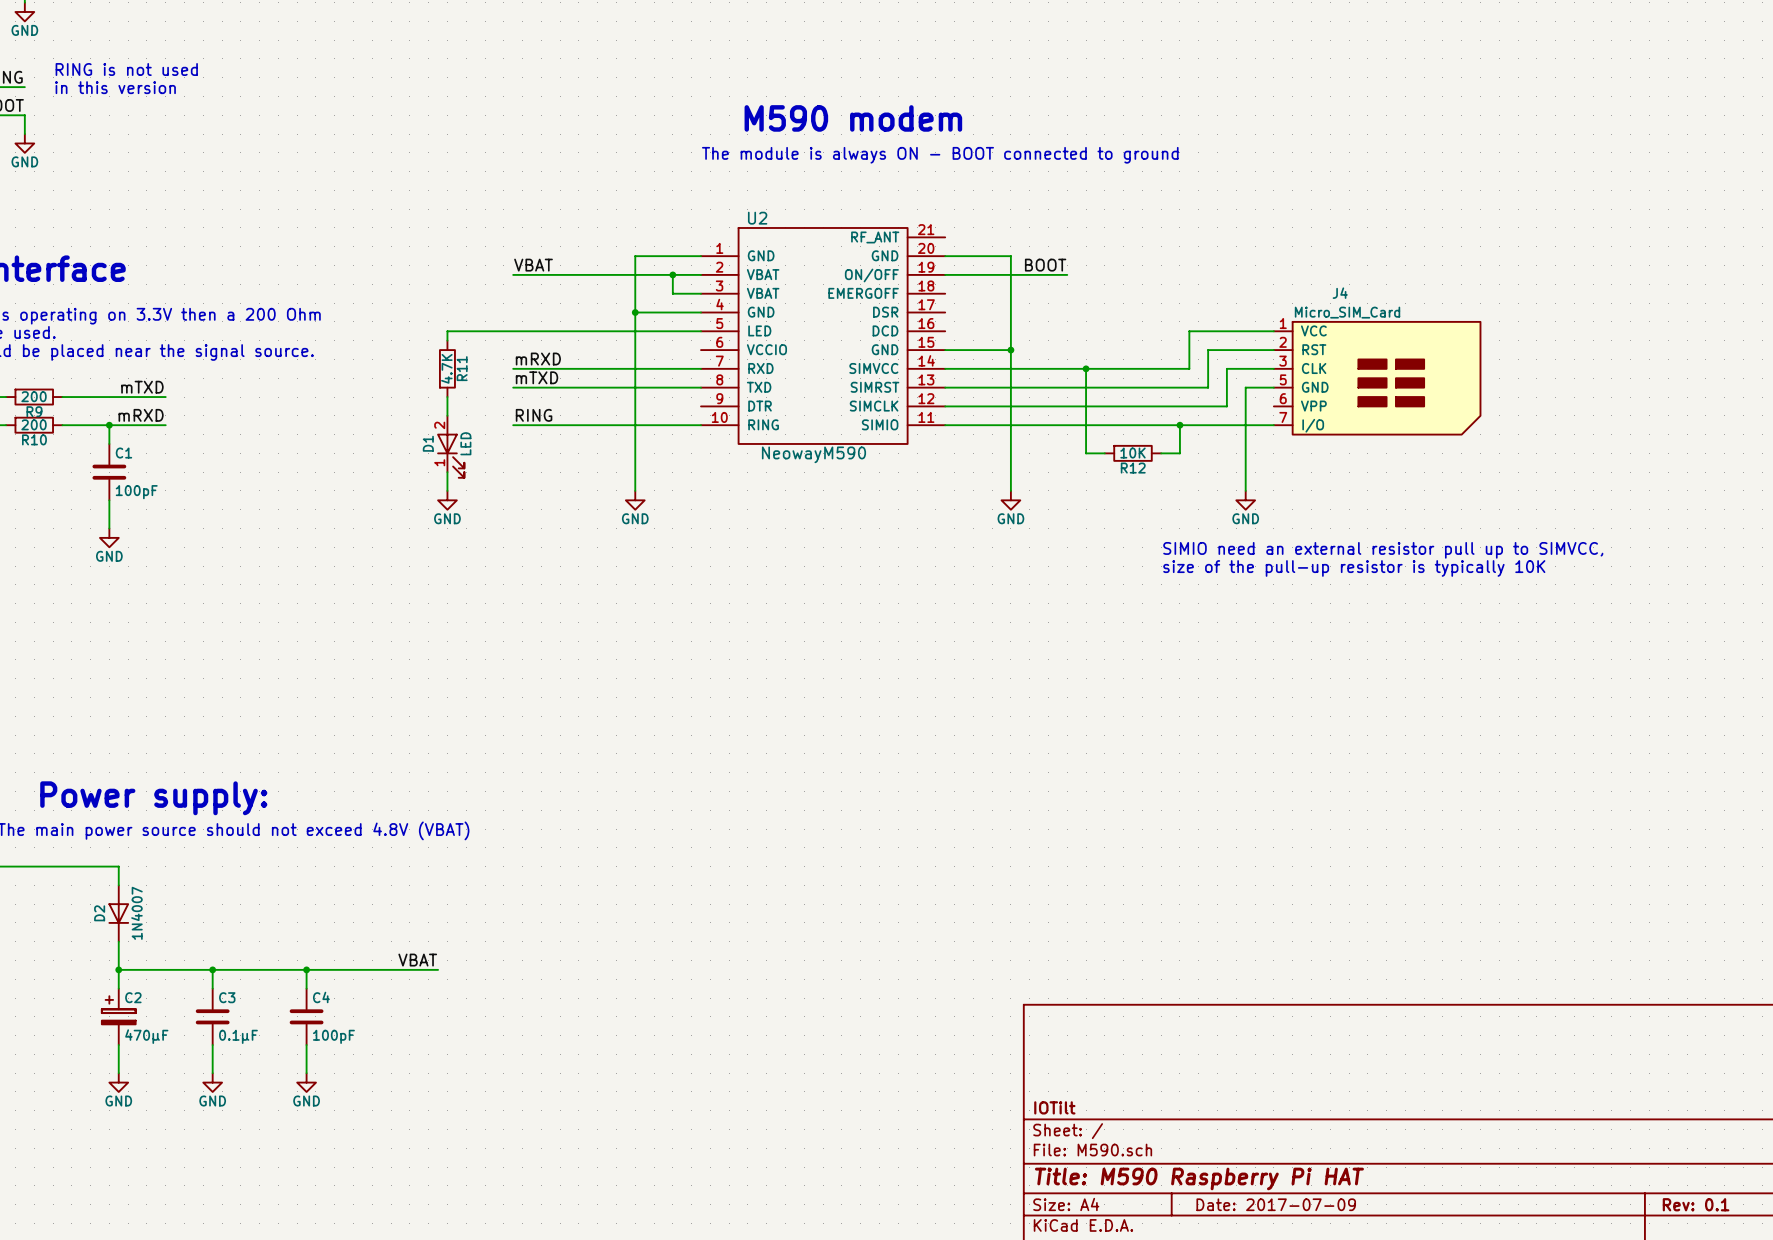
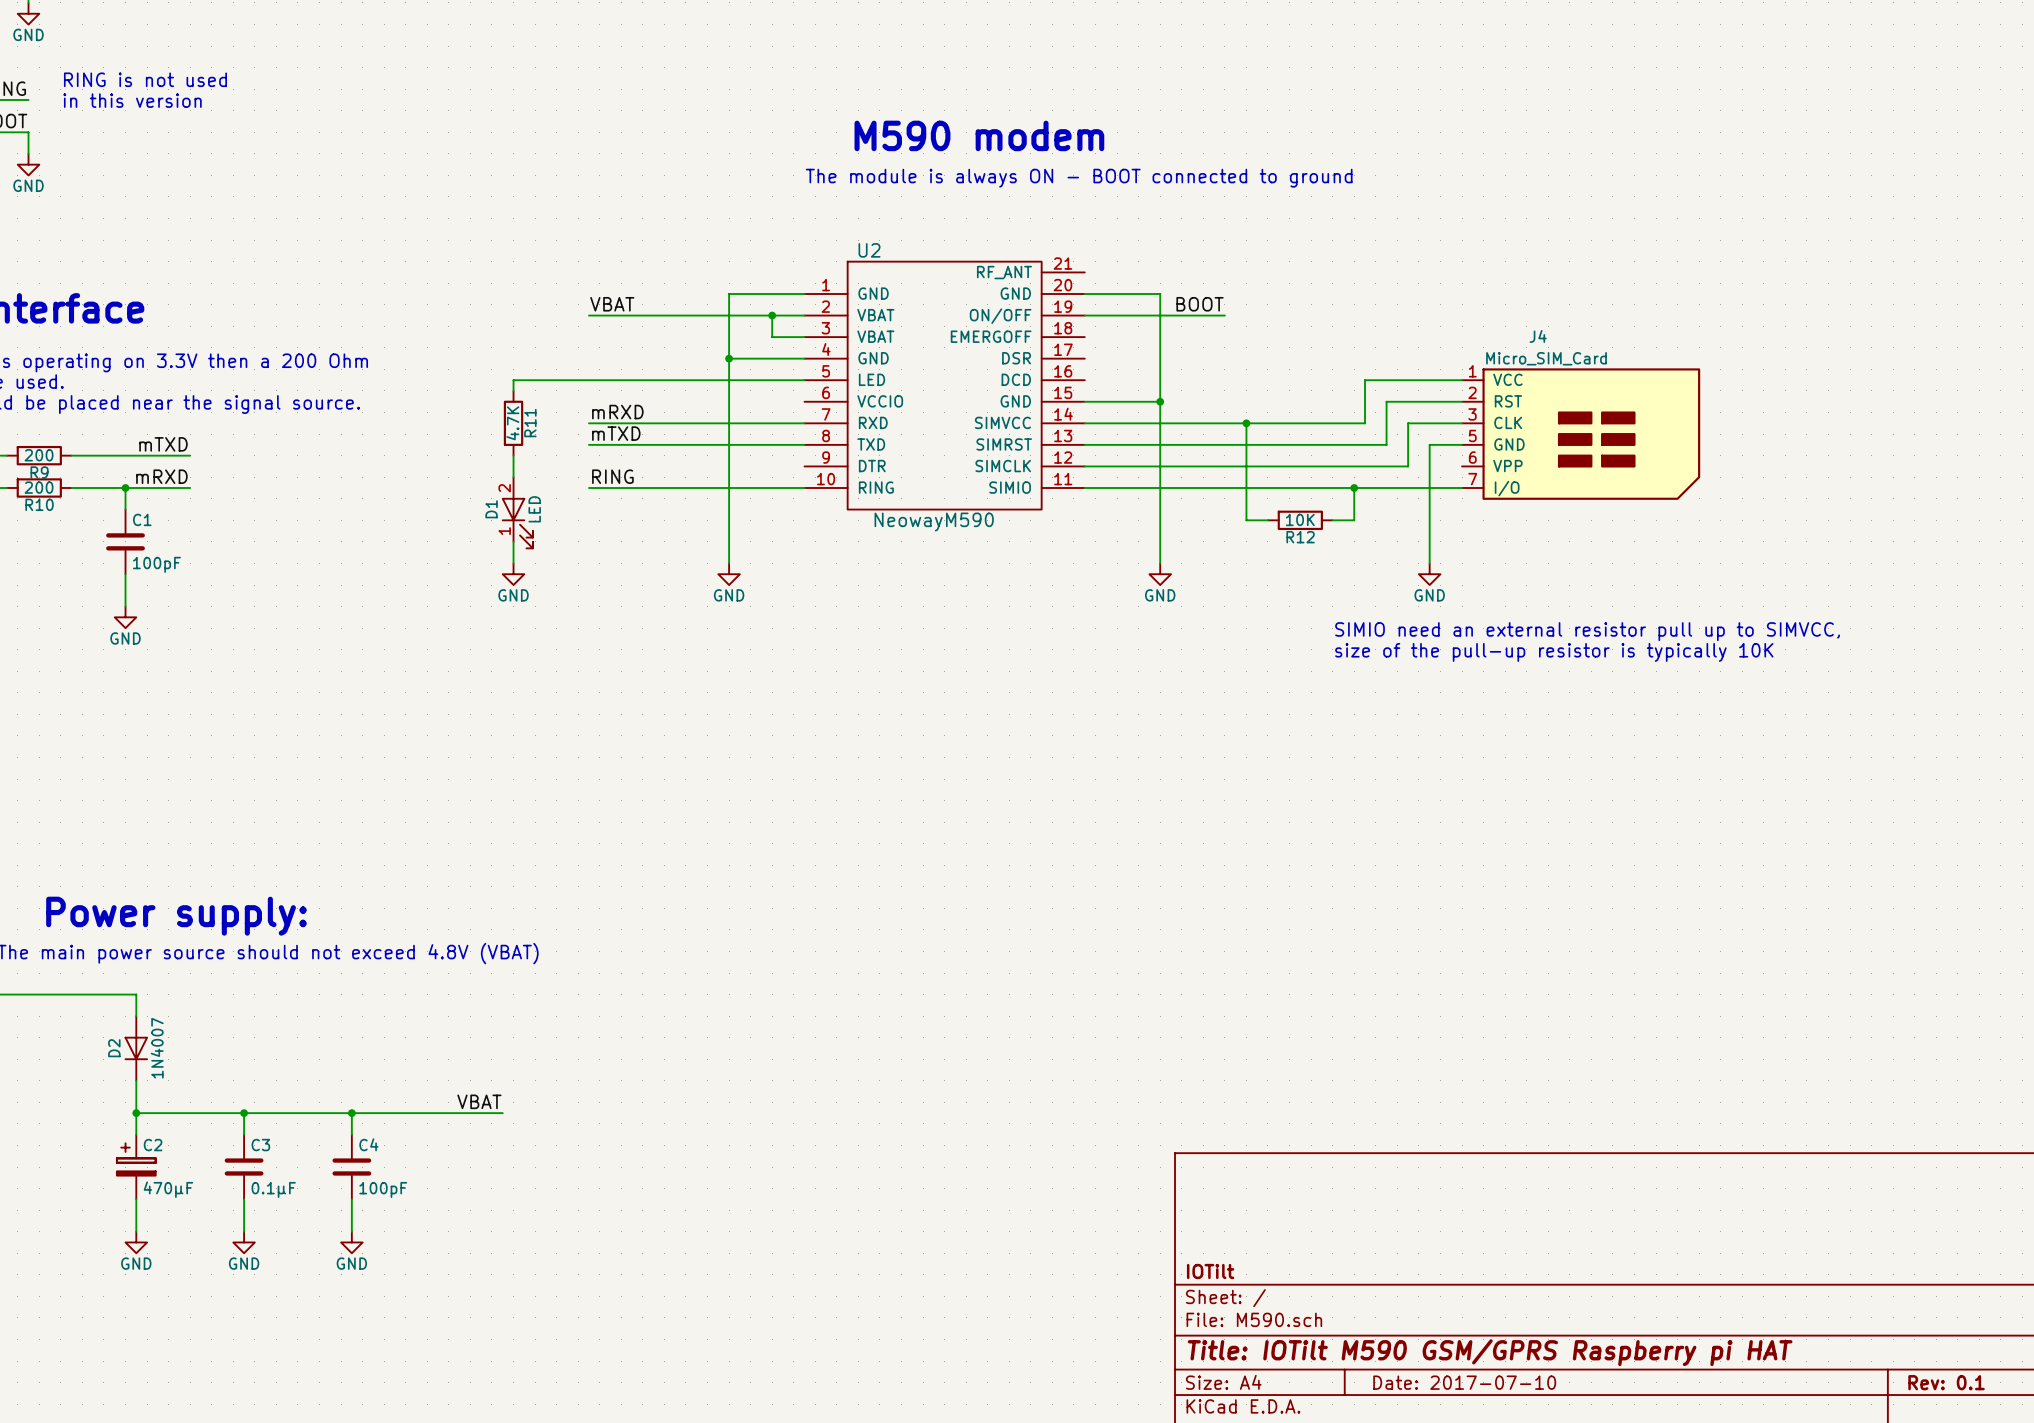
title block: Title: M590 Raspberry Pi HAT (1199, 1178) -> Title: IOTilt M590 GSM/GPRS Raspberry pi HAT (1490, 1352)
title block: Date: 2017-07-09 (1276, 1204) -> Date: 2017-07-10 (1464, 1382)

